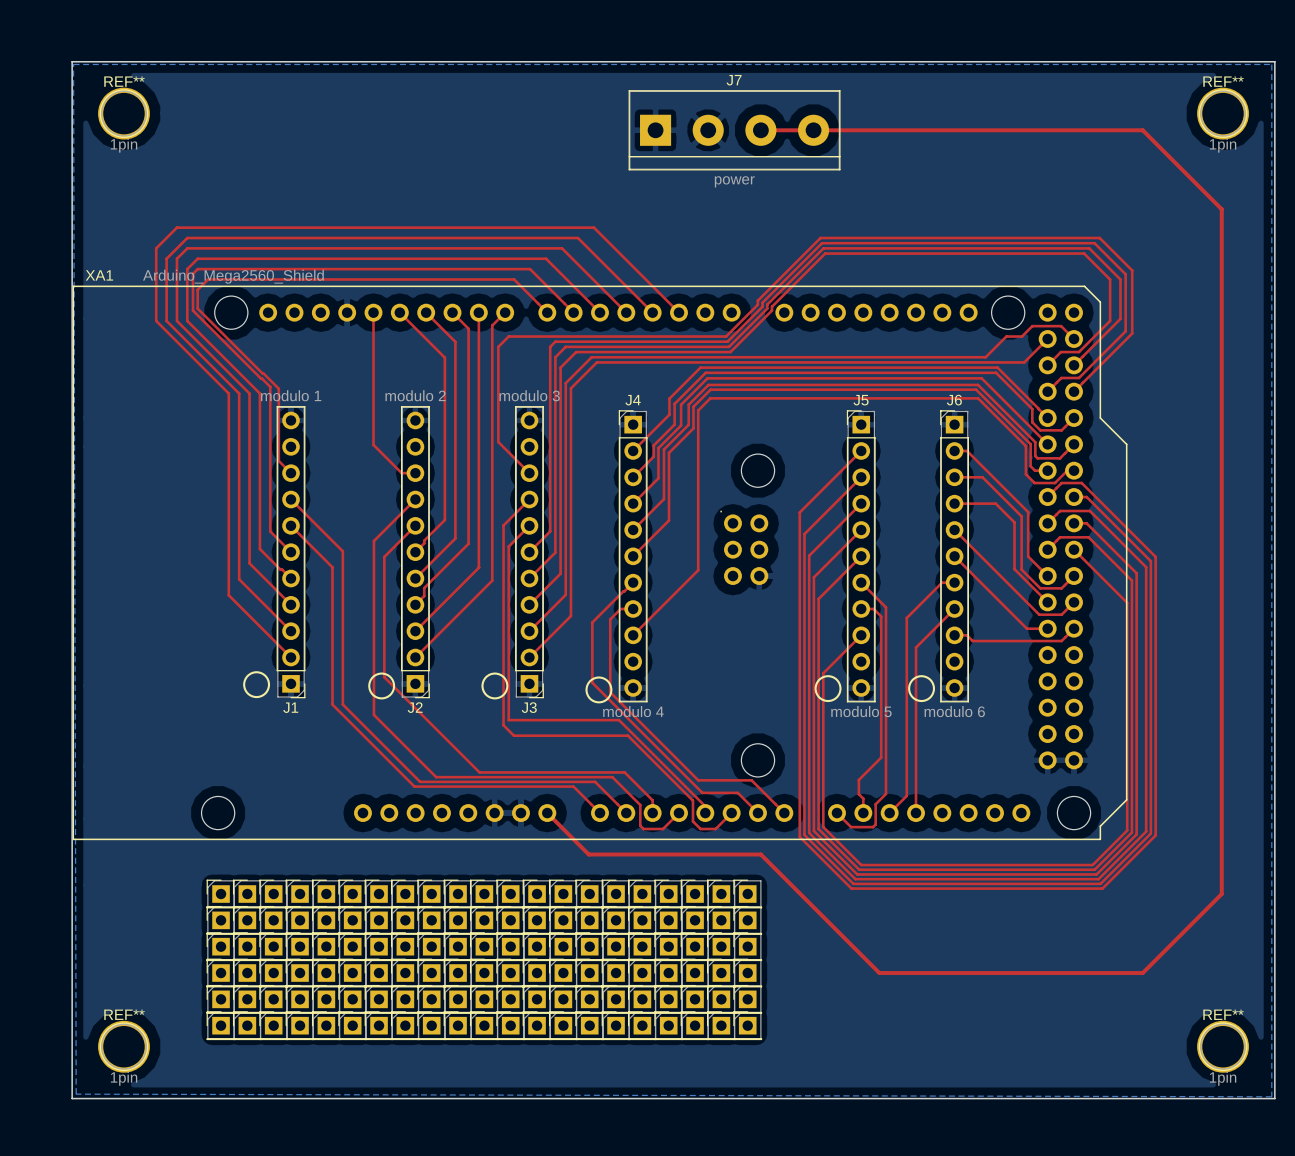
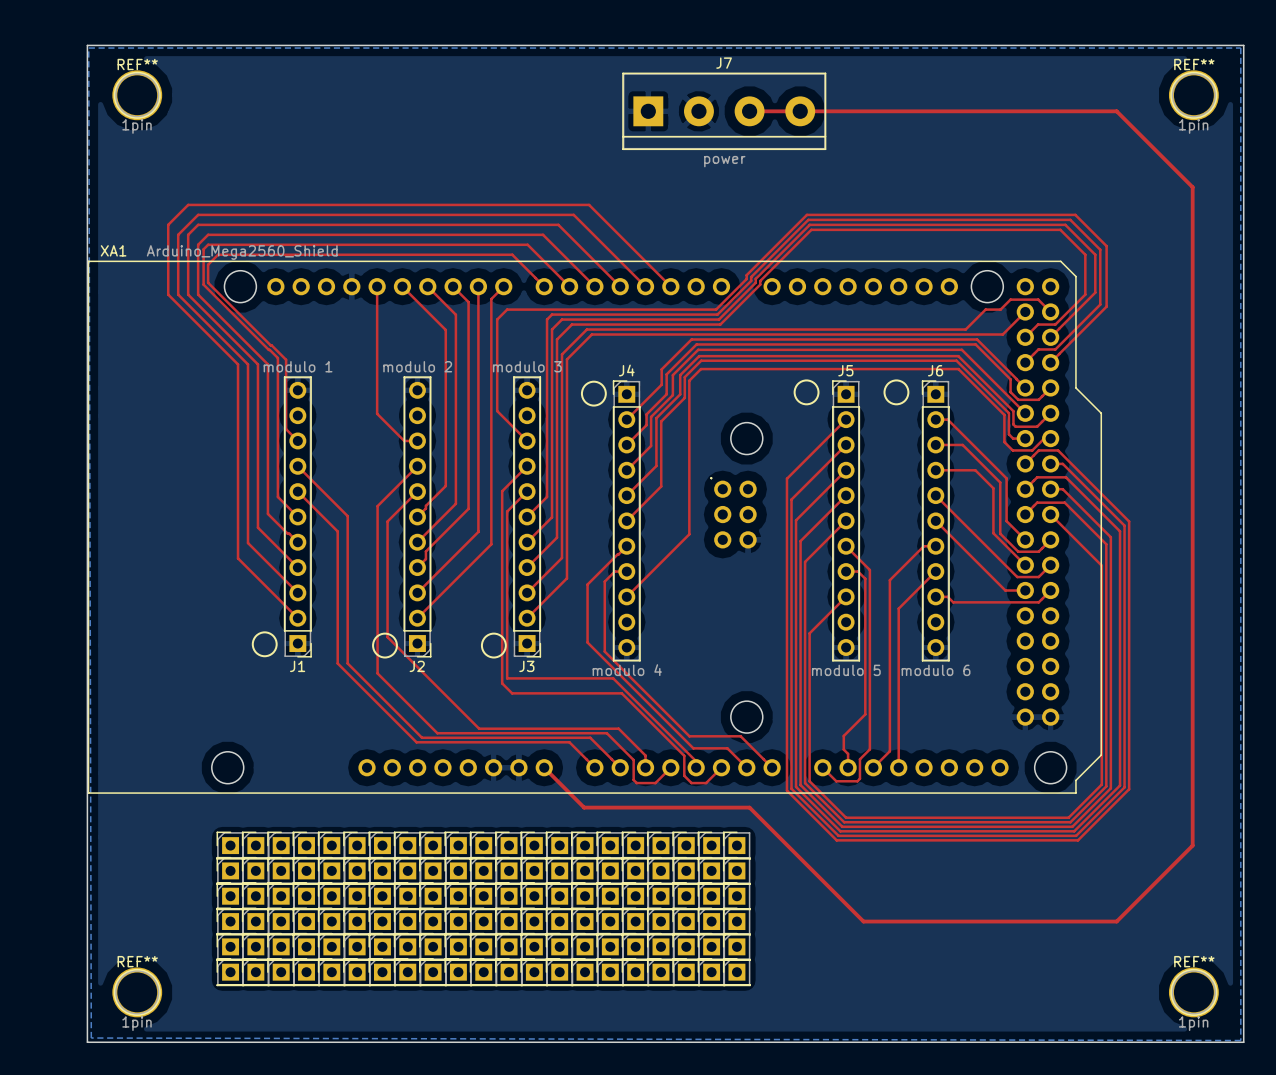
drawing: none -> [793, 379, 820, 406]
drawing: none -> [883, 379, 910, 406]
drawing: none -> [580, 380, 607, 407]
drawing: [814, 675, 842, 703] -> none
drawing: [908, 675, 936, 703] -> none
drawing: [585, 676, 613, 704] -> none

